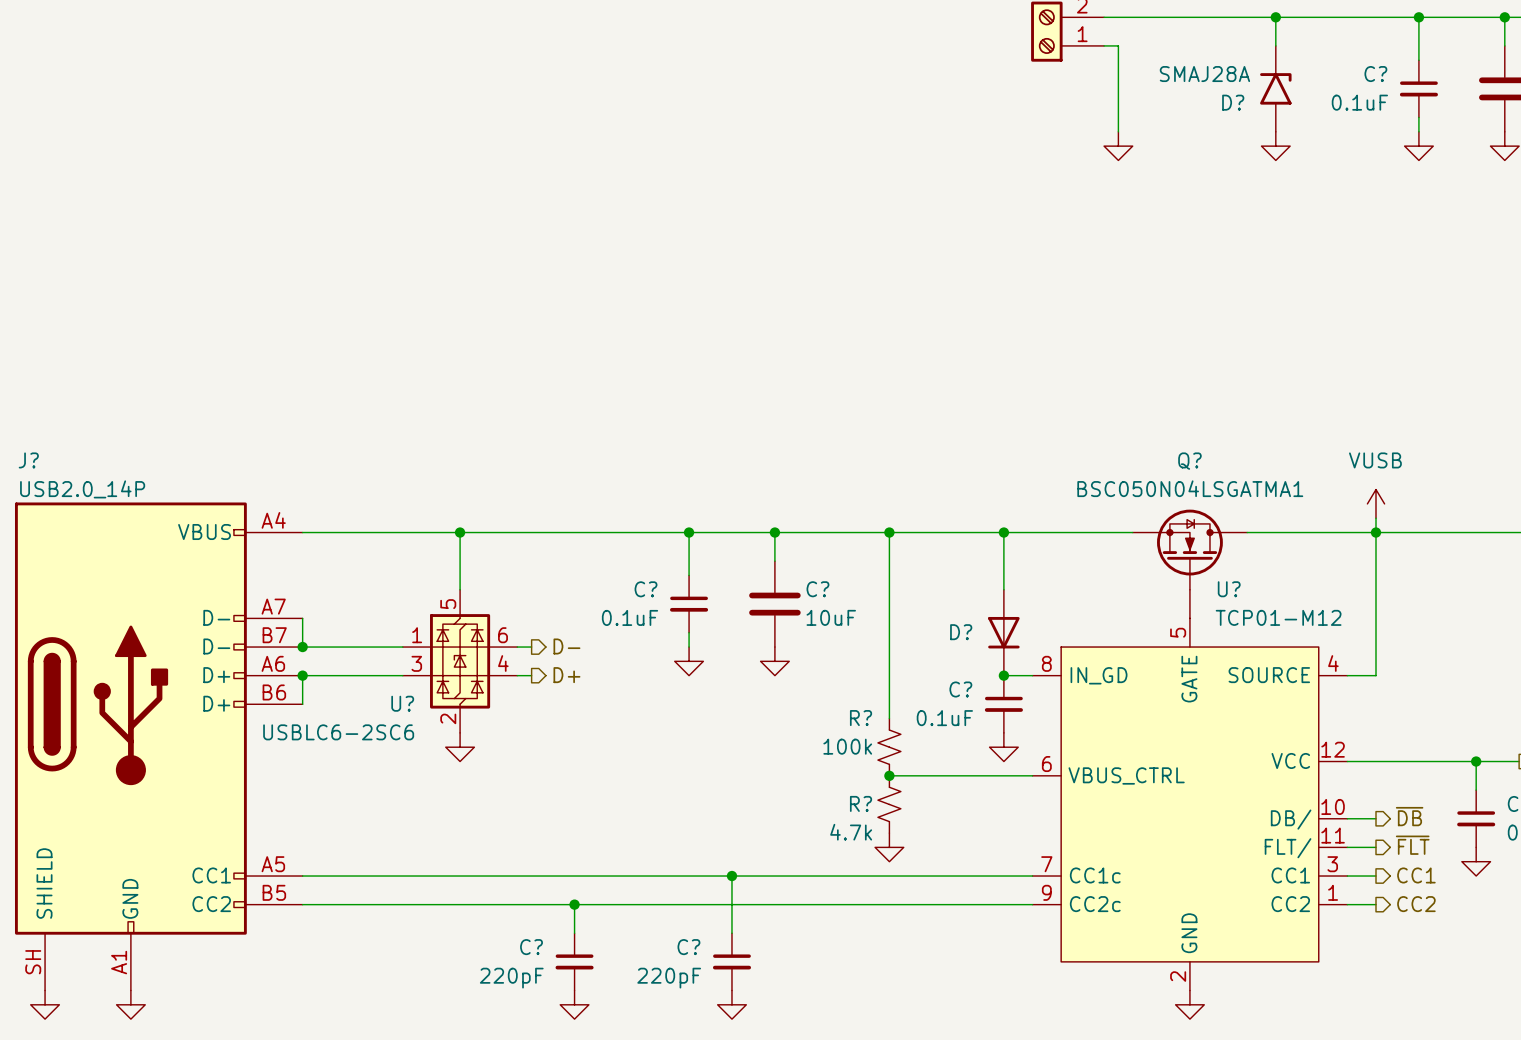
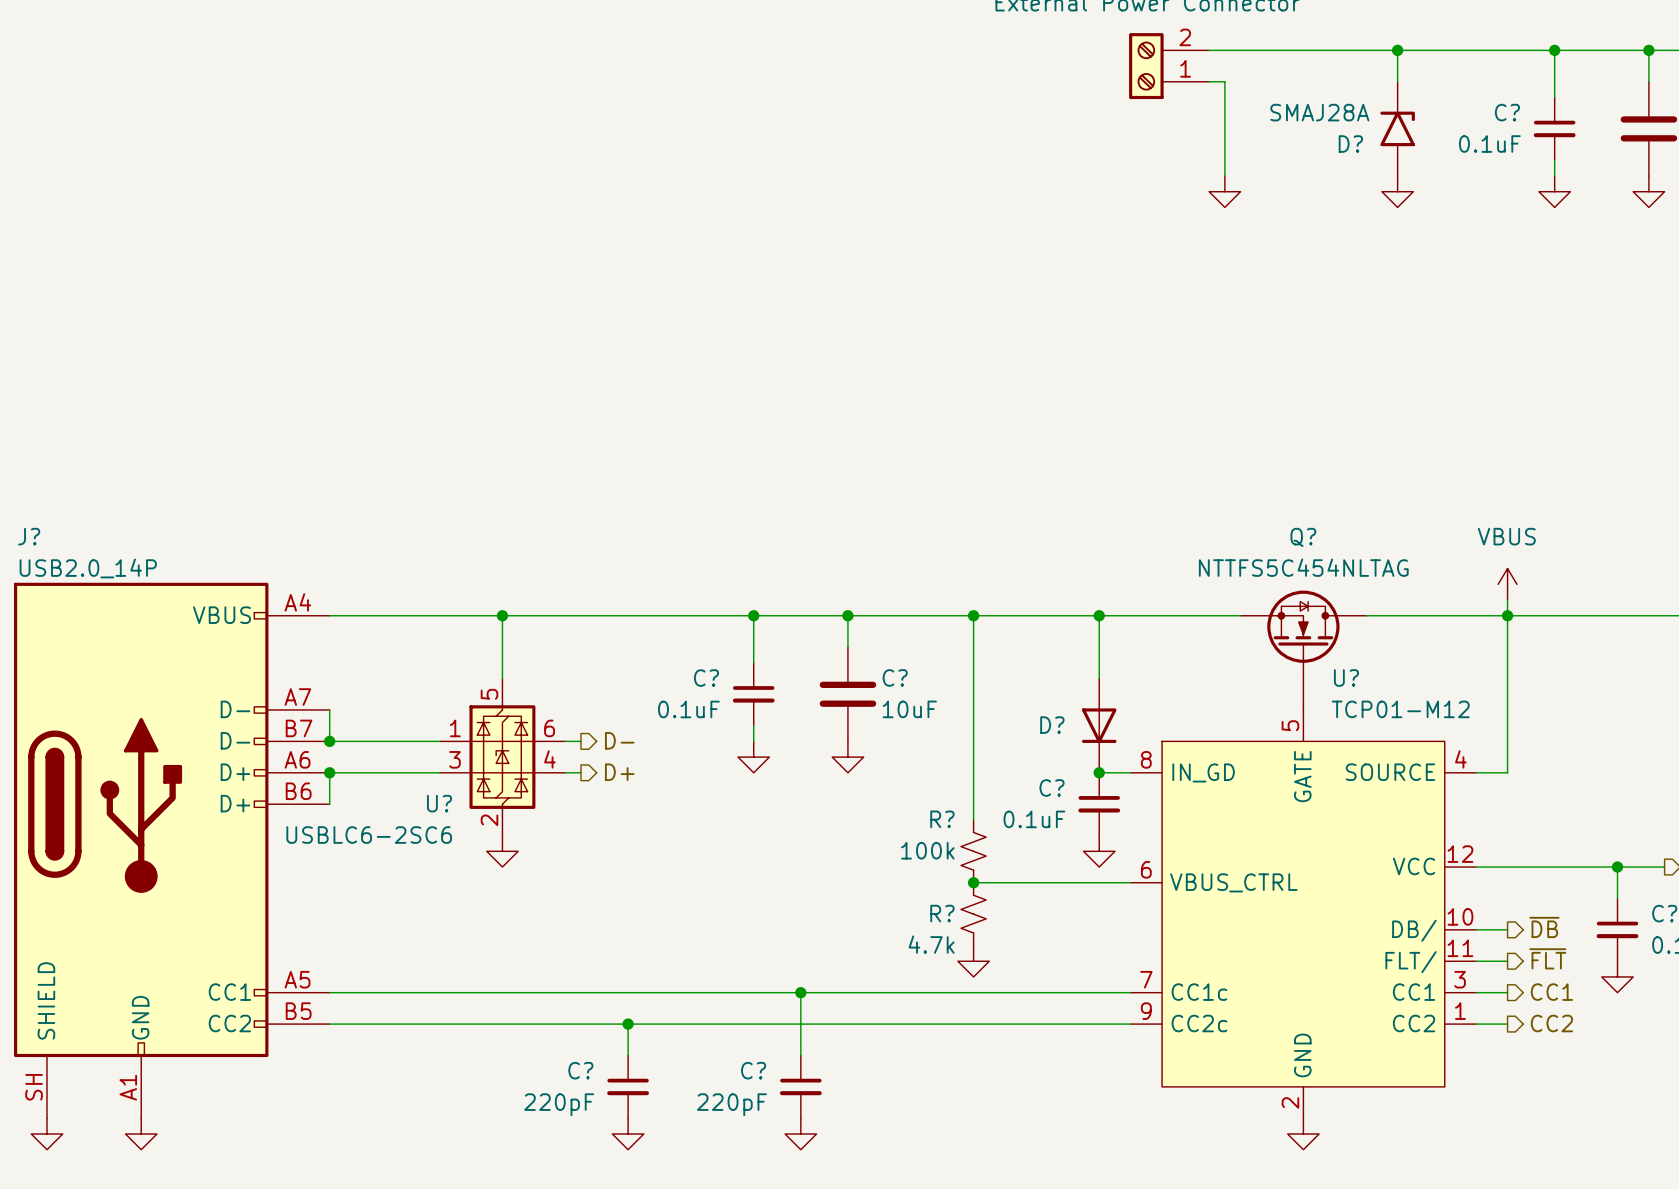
Q? value: BSC050N04LSGATMA1 (1190, 488) -> NTTFS5C454NLTAG (1303, 567)
power symbol: VUSB (1376, 503) -> VBUS (1507, 584)

